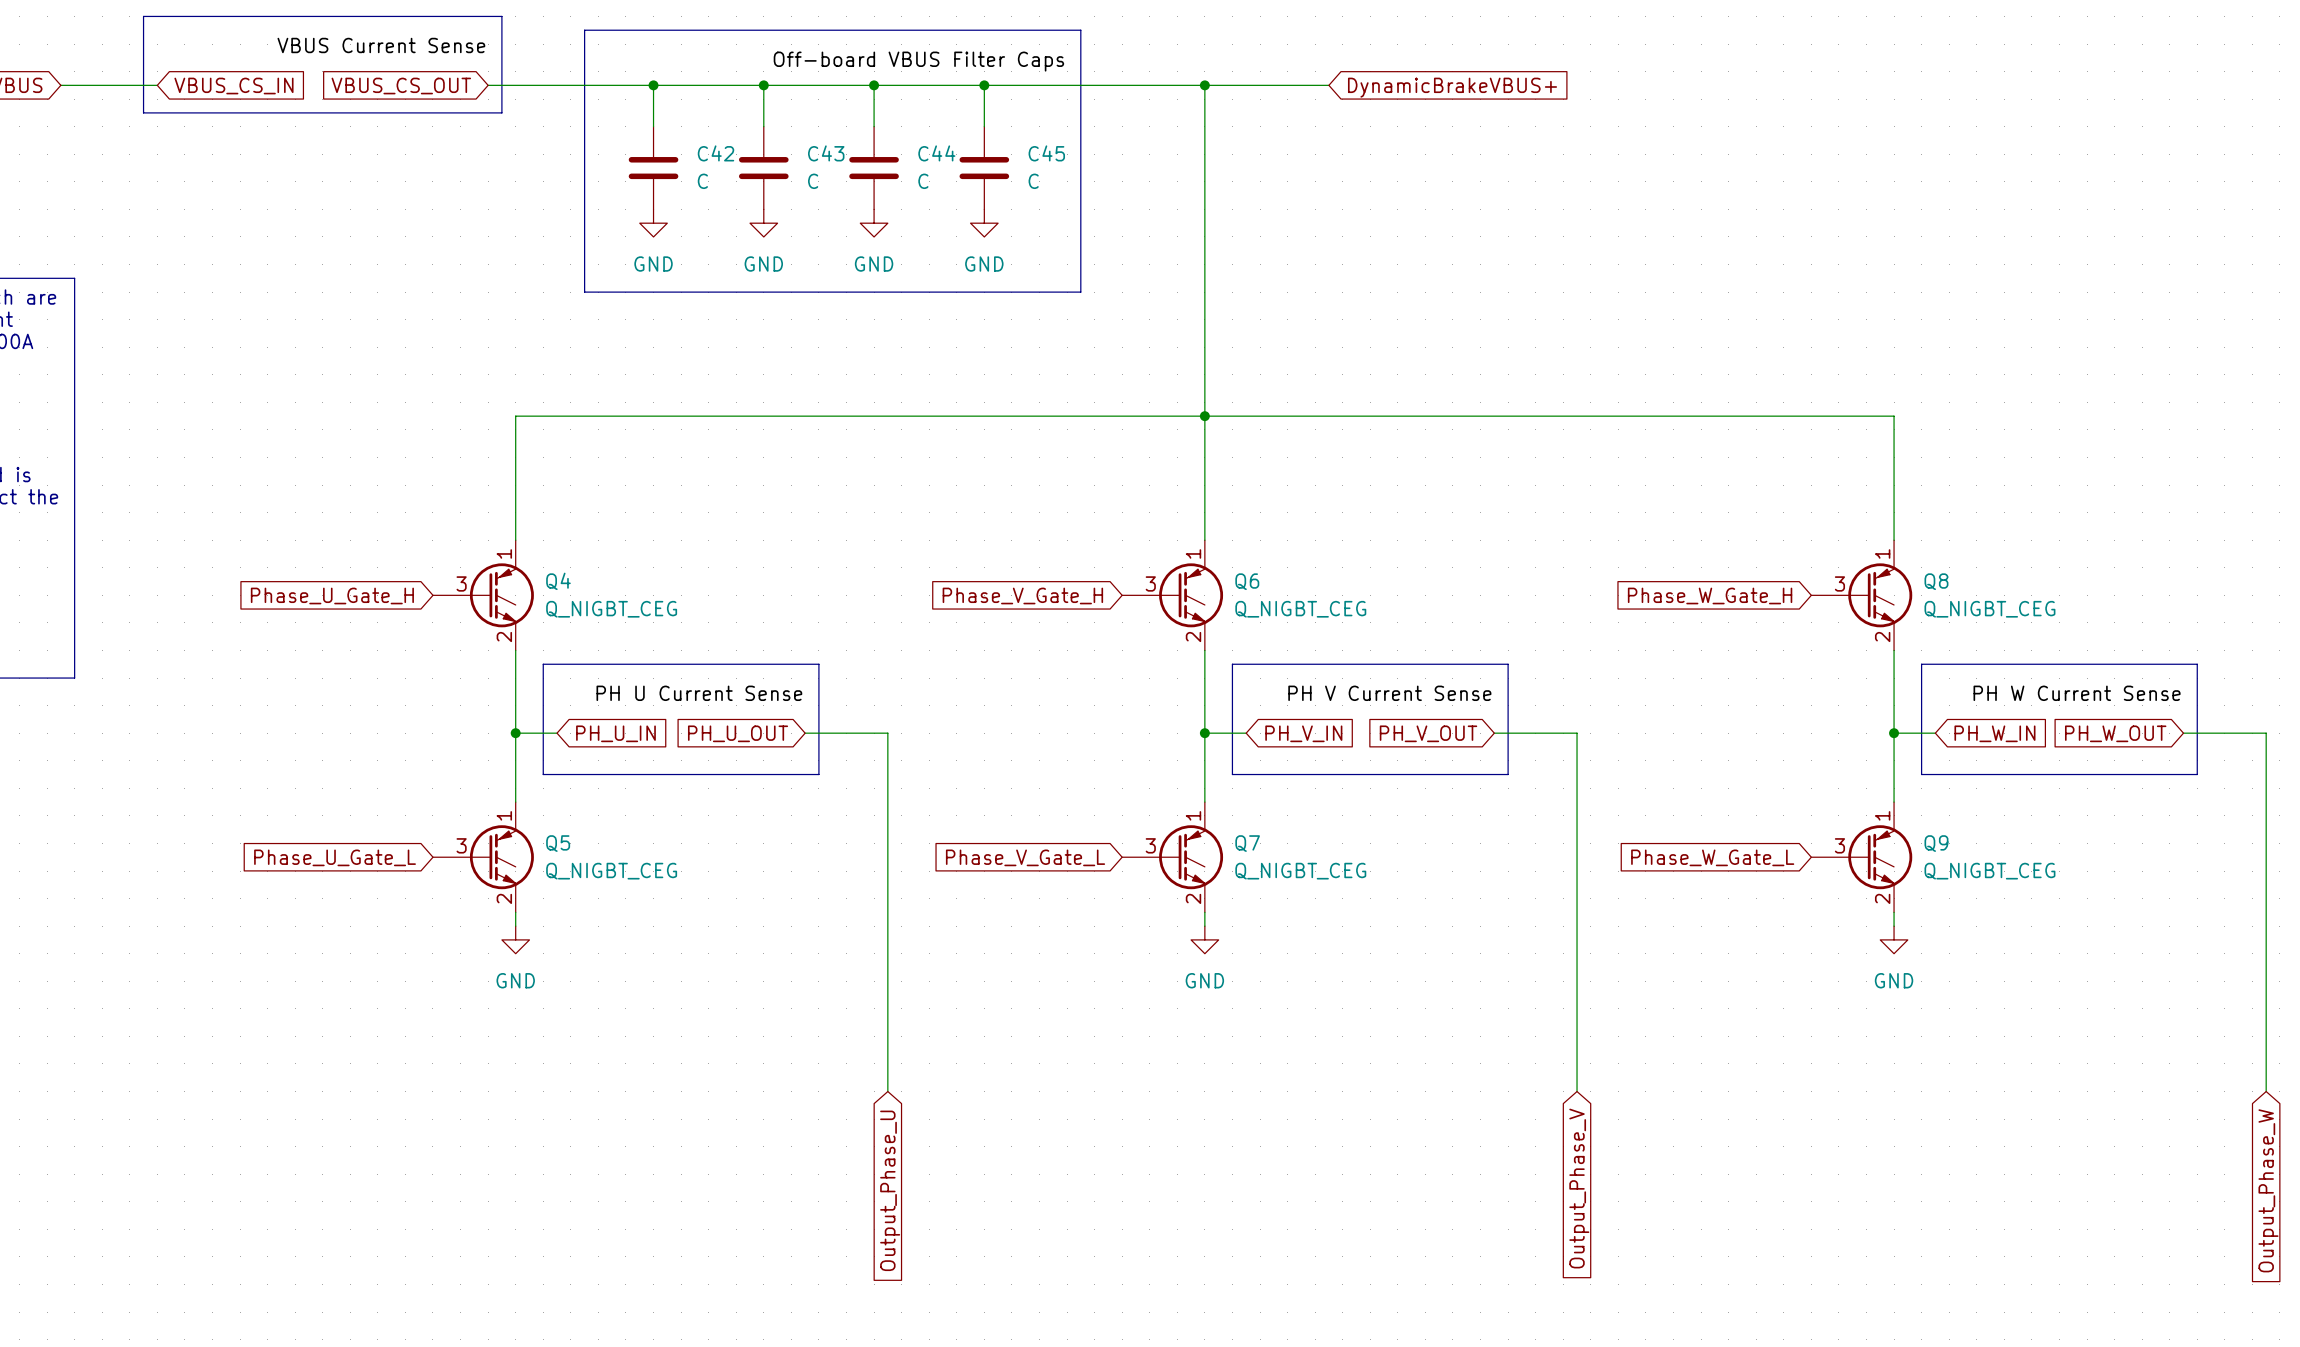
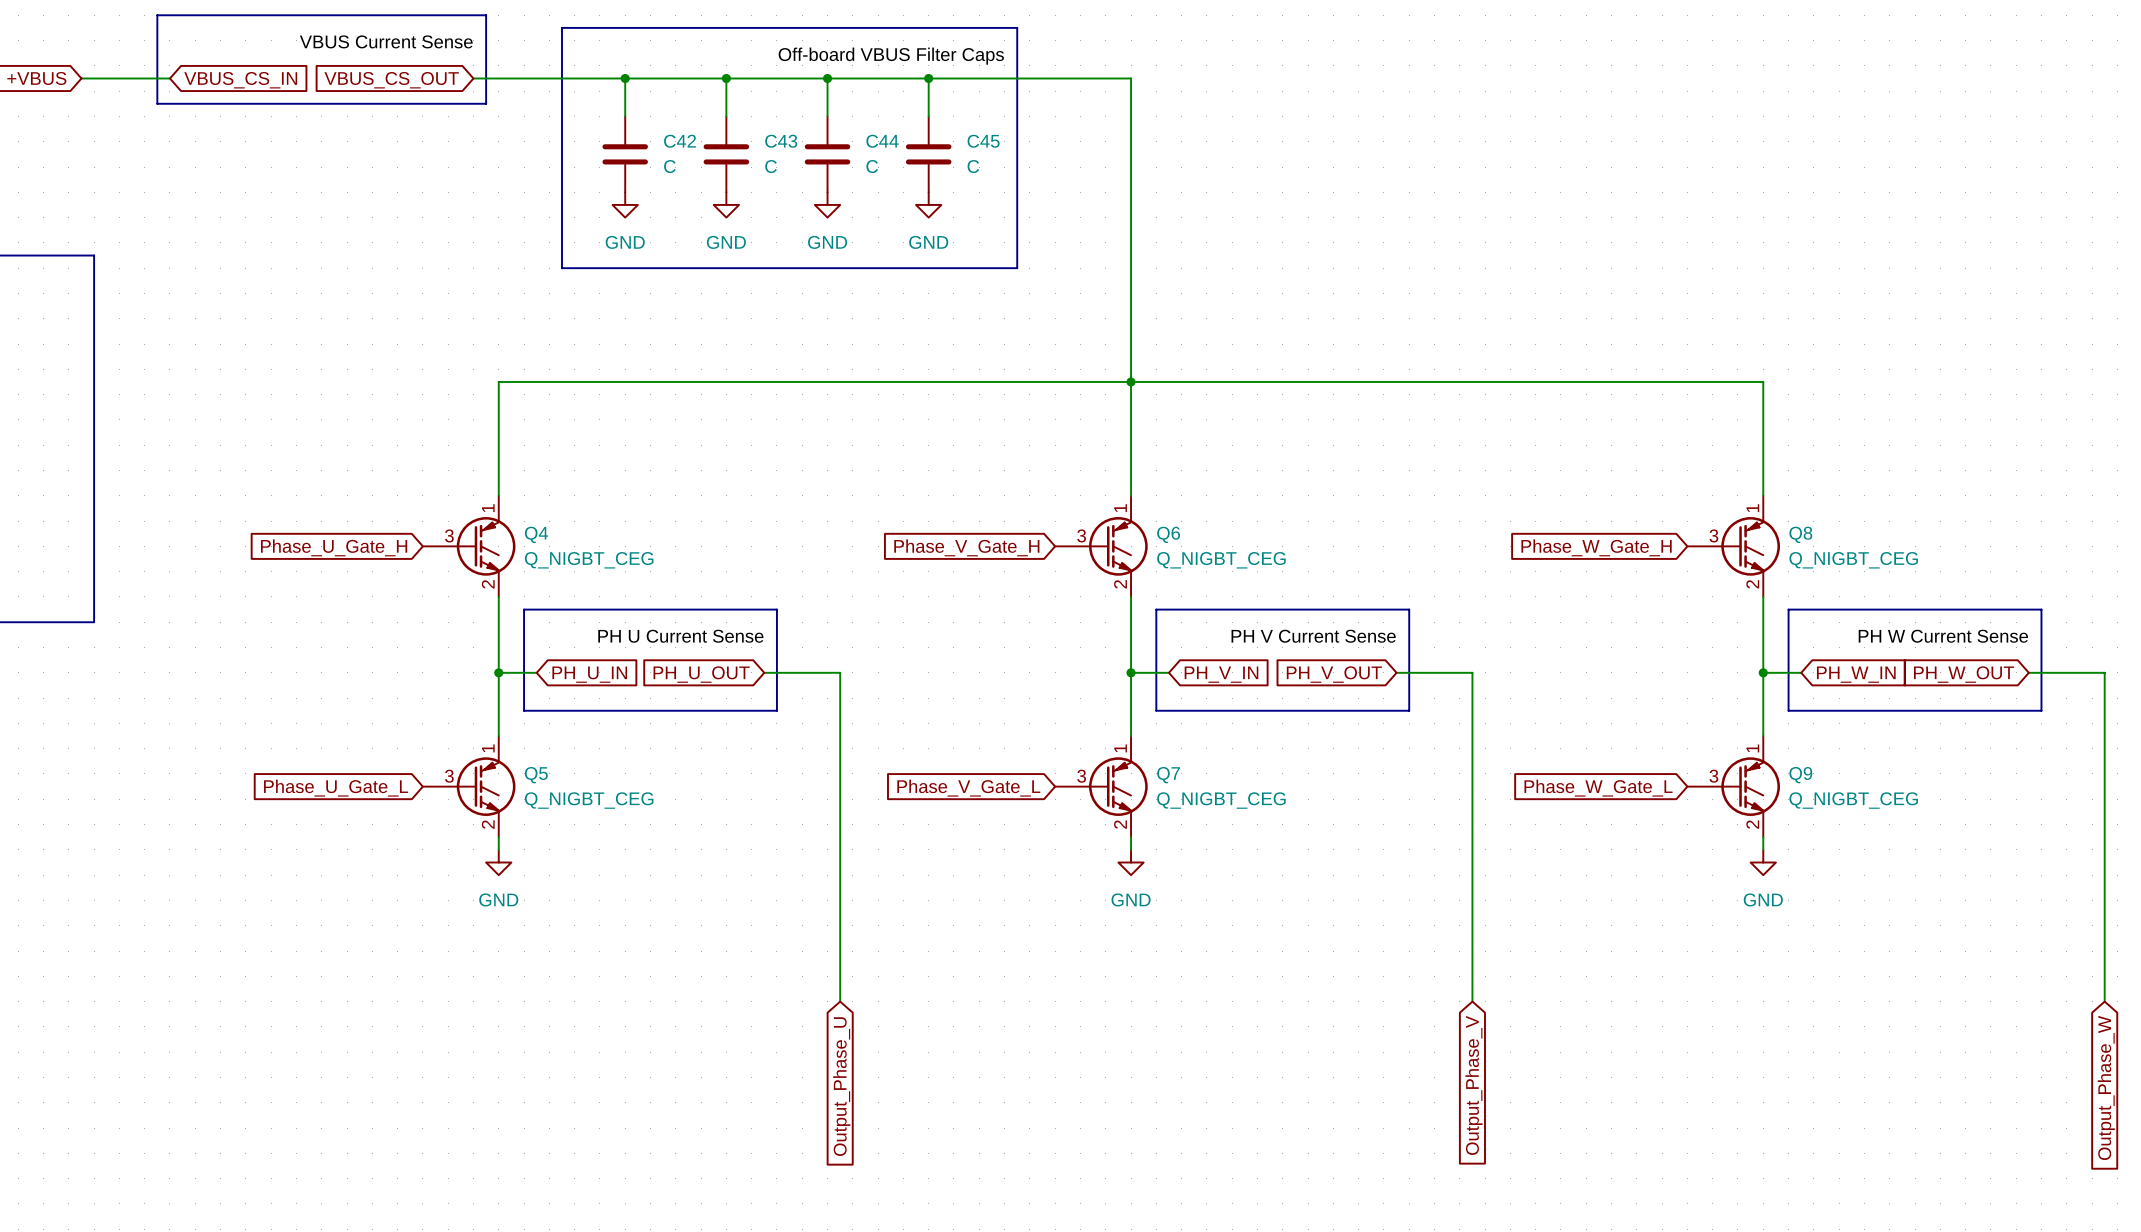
wire: (1204, 85) (1328, 85) -> none
junction: (1204, 85) -> none
global label: DynamicBrakeVBUS+ (1452, 87) -> none

